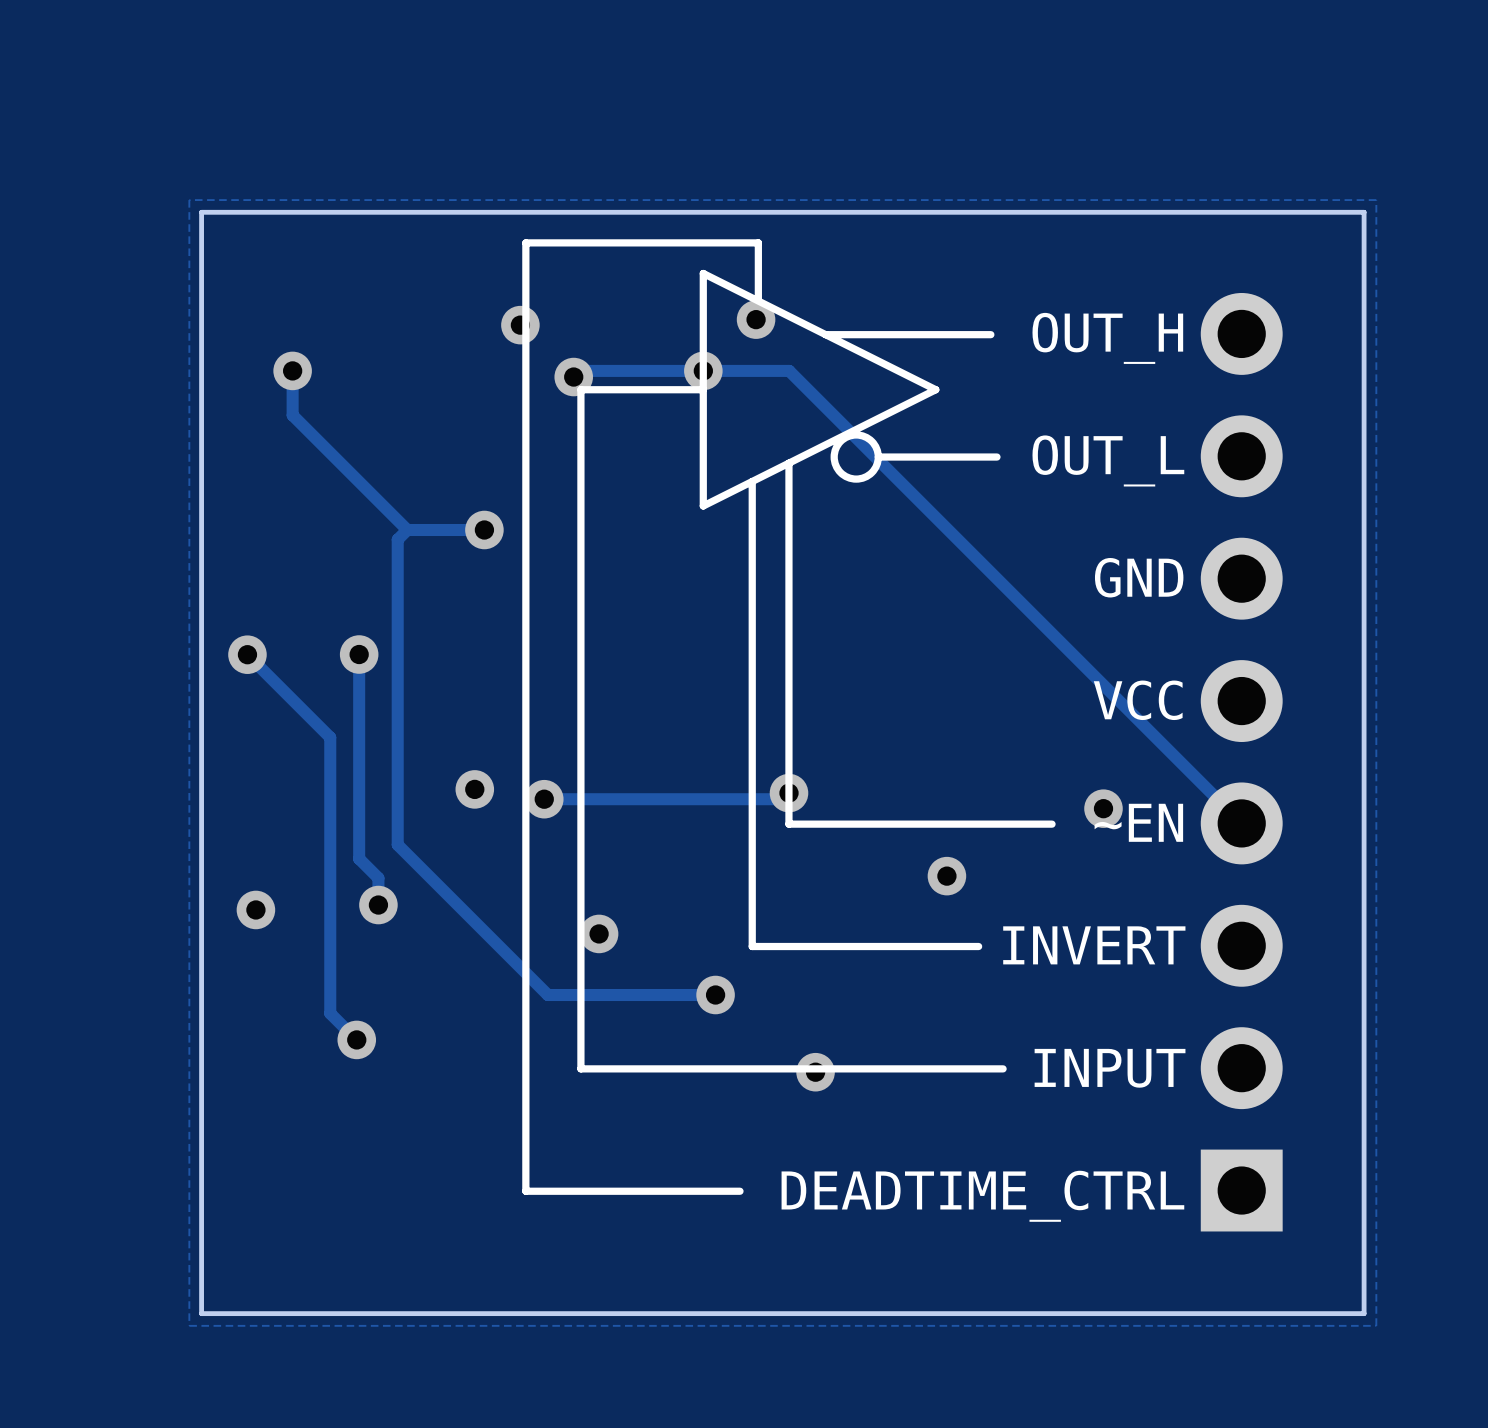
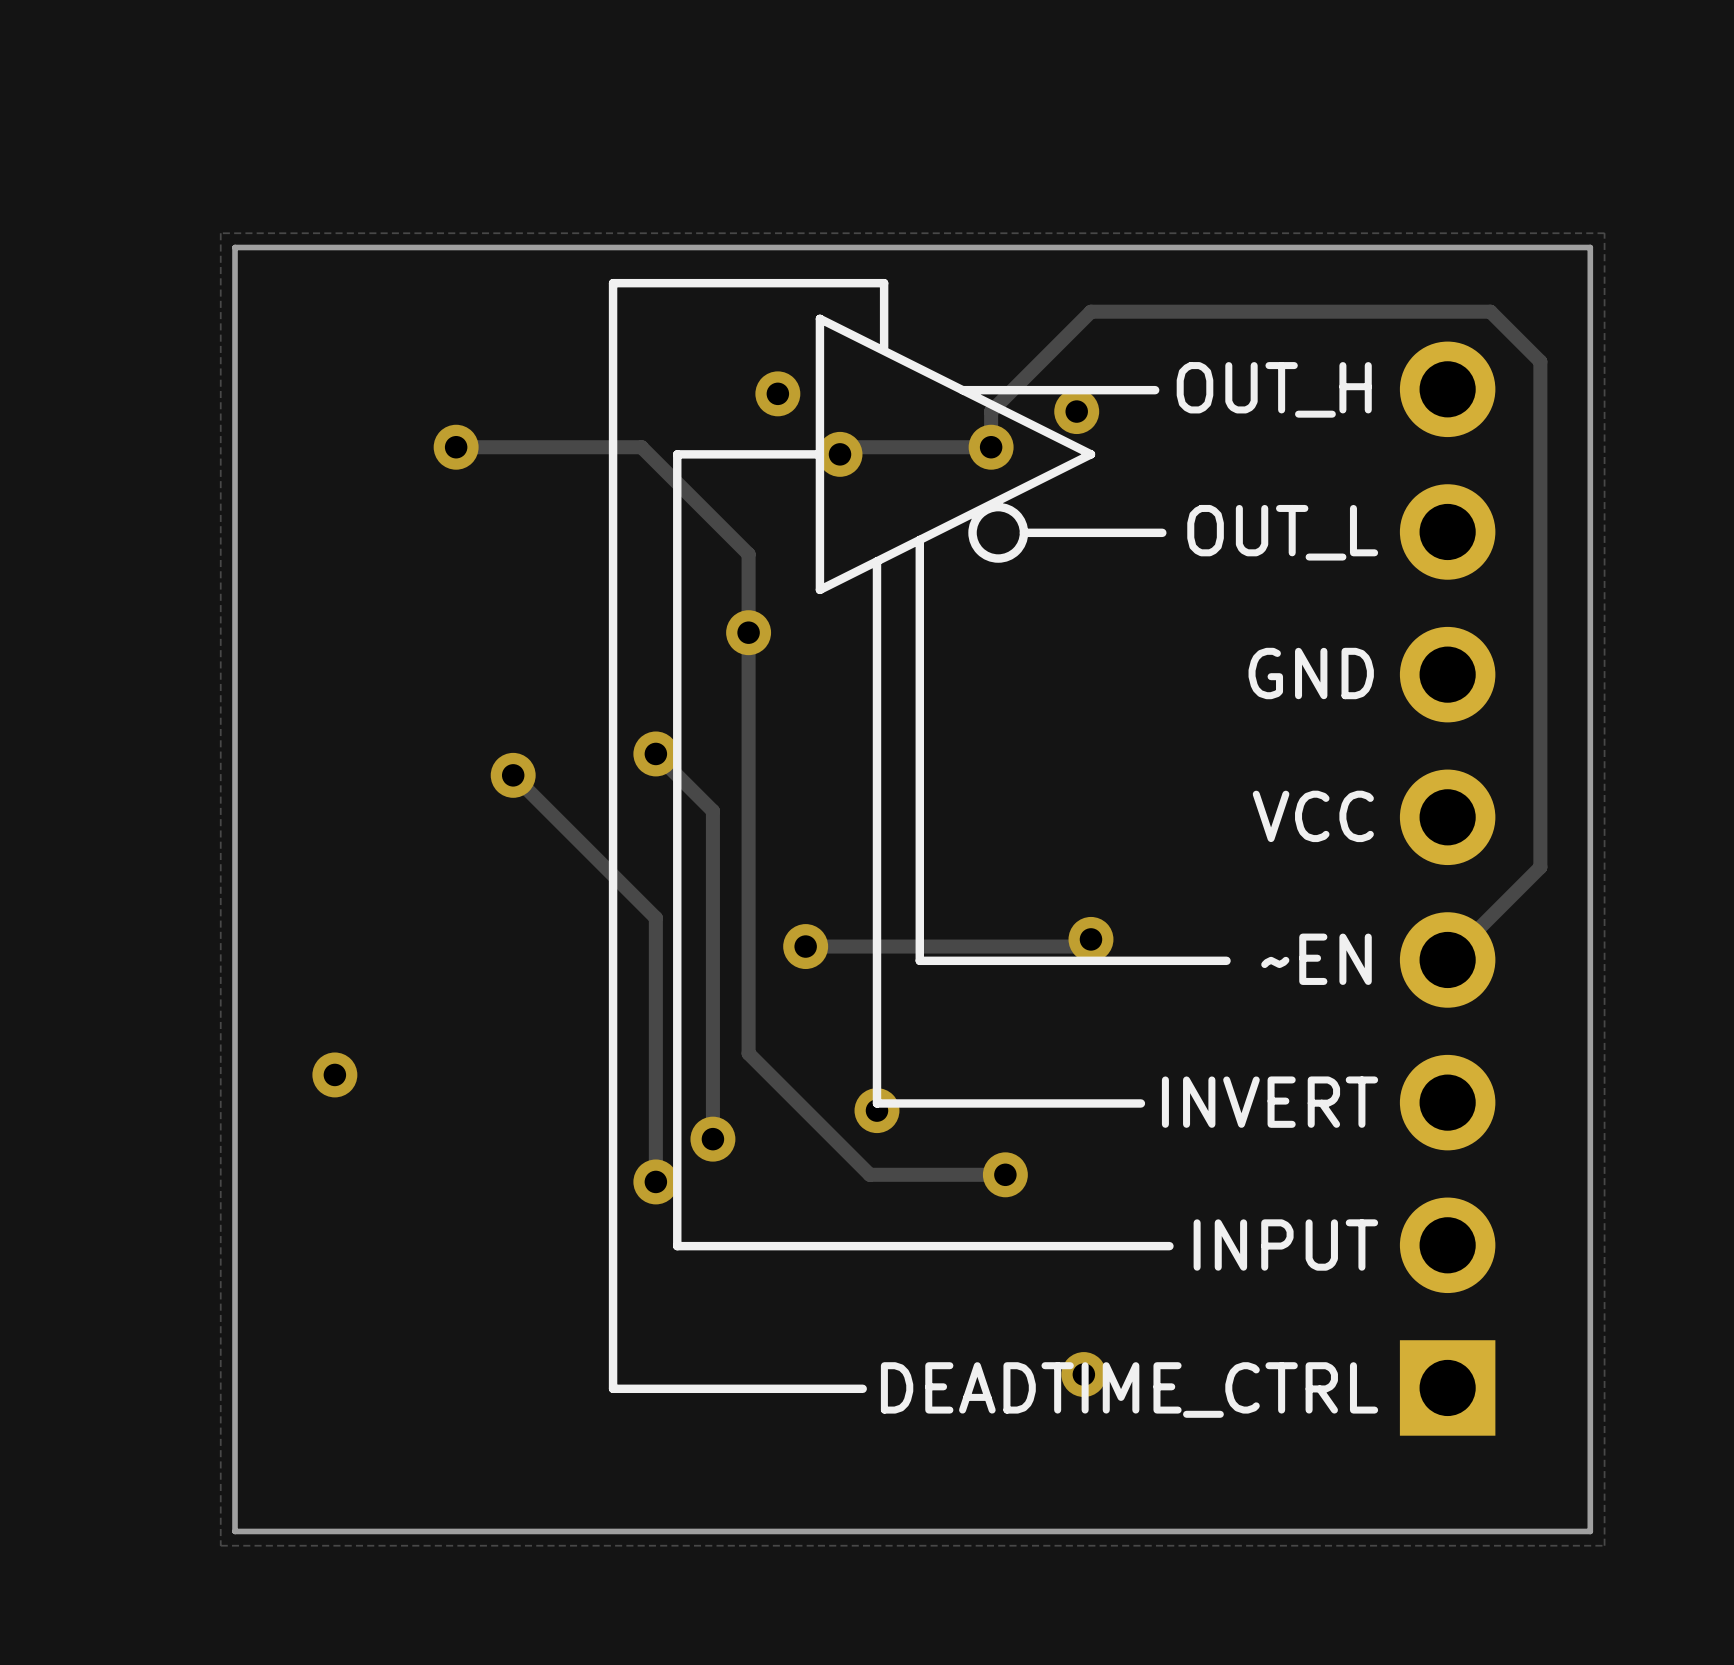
via: (756, 319) -> none
via: (520, 325) -> none
via: none -> (777, 393)
via: none -> (1076, 411)
track: (292, 370) (292, 415) (407, 530) -> none
via: (292, 370) -> none
via: (703, 370) -> none
track: (573, 377) (579, 370) (789, 370) (1241, 823) -> (840, 454) (847, 447) (991, 447) (991, 411) (1090, 311) (1490, 311) (1540, 361) (1540, 867) (1447, 959)
via: (573, 377) -> none
track: none -> (456, 447) (641, 447) (748, 554) (748, 1053) (869, 1174) (1005, 1174)
via: none -> (456, 447)
via: none -> (991, 447)
via: none -> (840, 454)
track: (407, 530) (397, 539) (397, 844) (547, 995) (715, 995) -> none
track: (484, 530) (407, 530) -> none
via: (484, 530) -> none
via: none -> (748, 632)
track: none -> (655, 753) (712, 811) (712, 1139)
via: none -> (655, 753)
track: (247, 654) (330, 737) (330, 1013) (356, 1039) -> none
via: (247, 654) -> none
track: (359, 654) (359, 858) (378, 878) (378, 905) -> none
via: (359, 654) -> none
track: none -> (513, 775) (655, 918) (655, 1181)
via: none -> (513, 775)
via: (474, 789) -> none
track: (789, 793) (782, 799) (544, 799) -> (1090, 939) (1083, 946) (805, 946)
via: (789, 793) -> none
via: (544, 799) -> none
via: (1103, 808) -> none
via: none -> (805, 946)
via position: (946, 876) -> (1090, 939)
via: (378, 905) -> none
via position: (255, 909) -> (334, 1074)
via: (599, 933) -> none
via: none -> (876, 1110)
via: none -> (712, 1139)
via: (715, 995) -> none
via: none -> (1005, 1174)
via: none -> (655, 1181)
via: (356, 1039) -> none
via: (815, 1072) -> none
via: none -> (1083, 1374)

